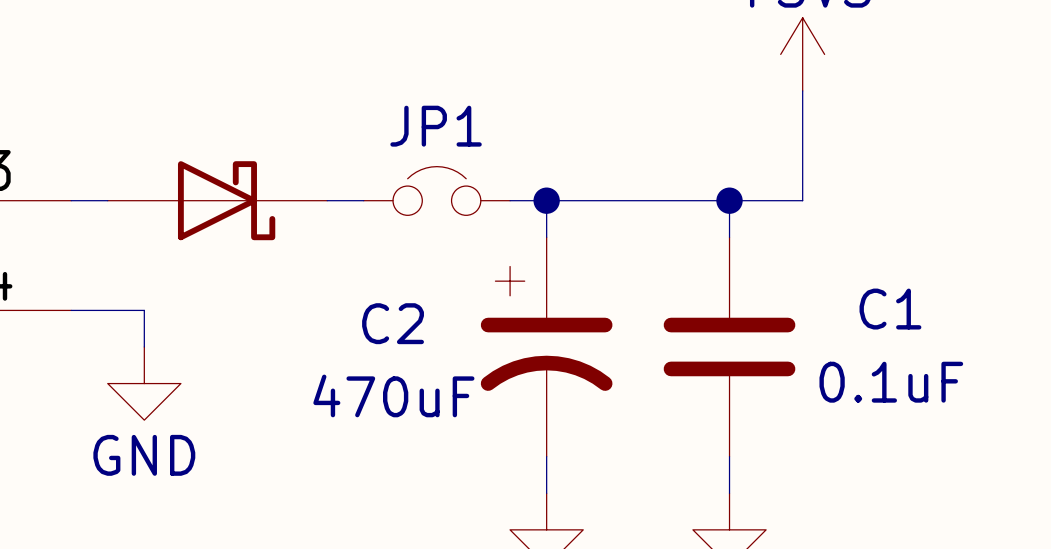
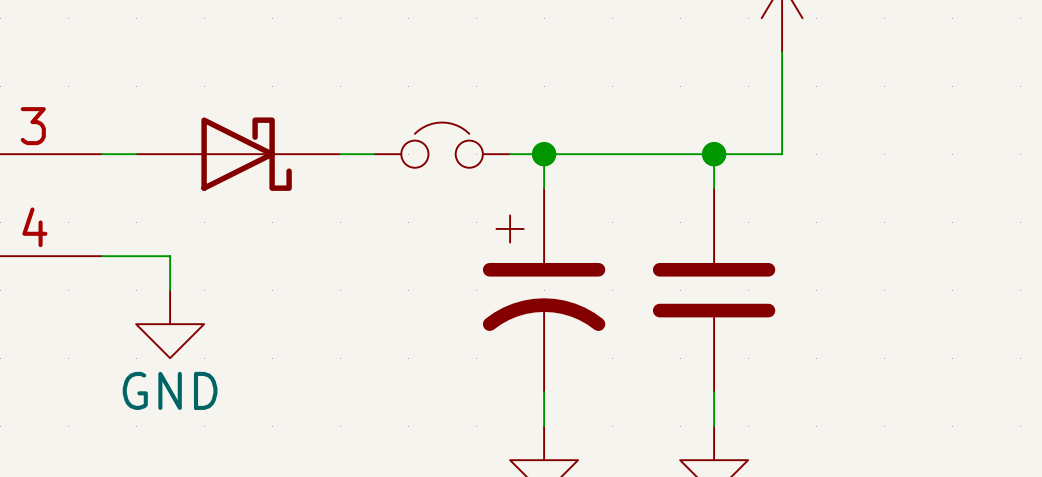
JP1 name: JP1 (436, 126) -> none
C1 name: C1 (890, 309) -> none
C2 name: C2 (393, 323) -> none
C1 value: 0.1uF (891, 382) -> none
C2 value: 470uF (393, 395) -> none

